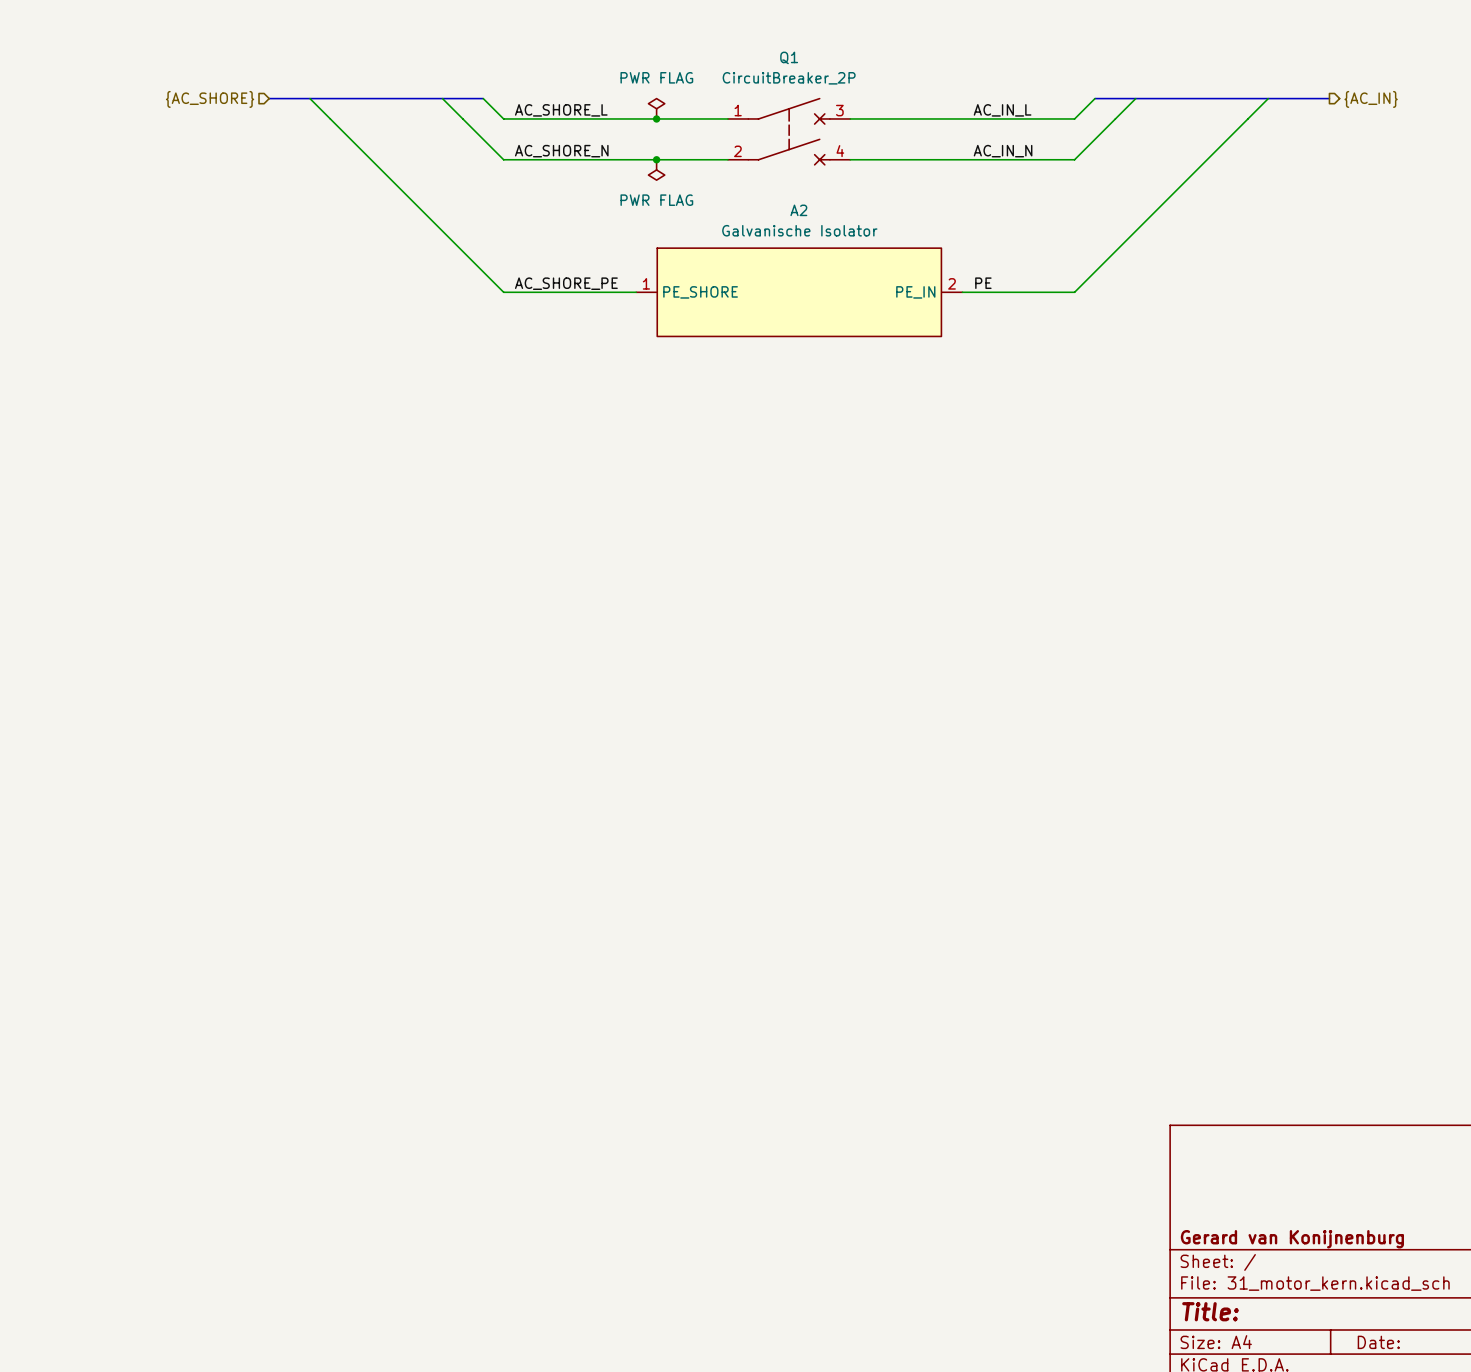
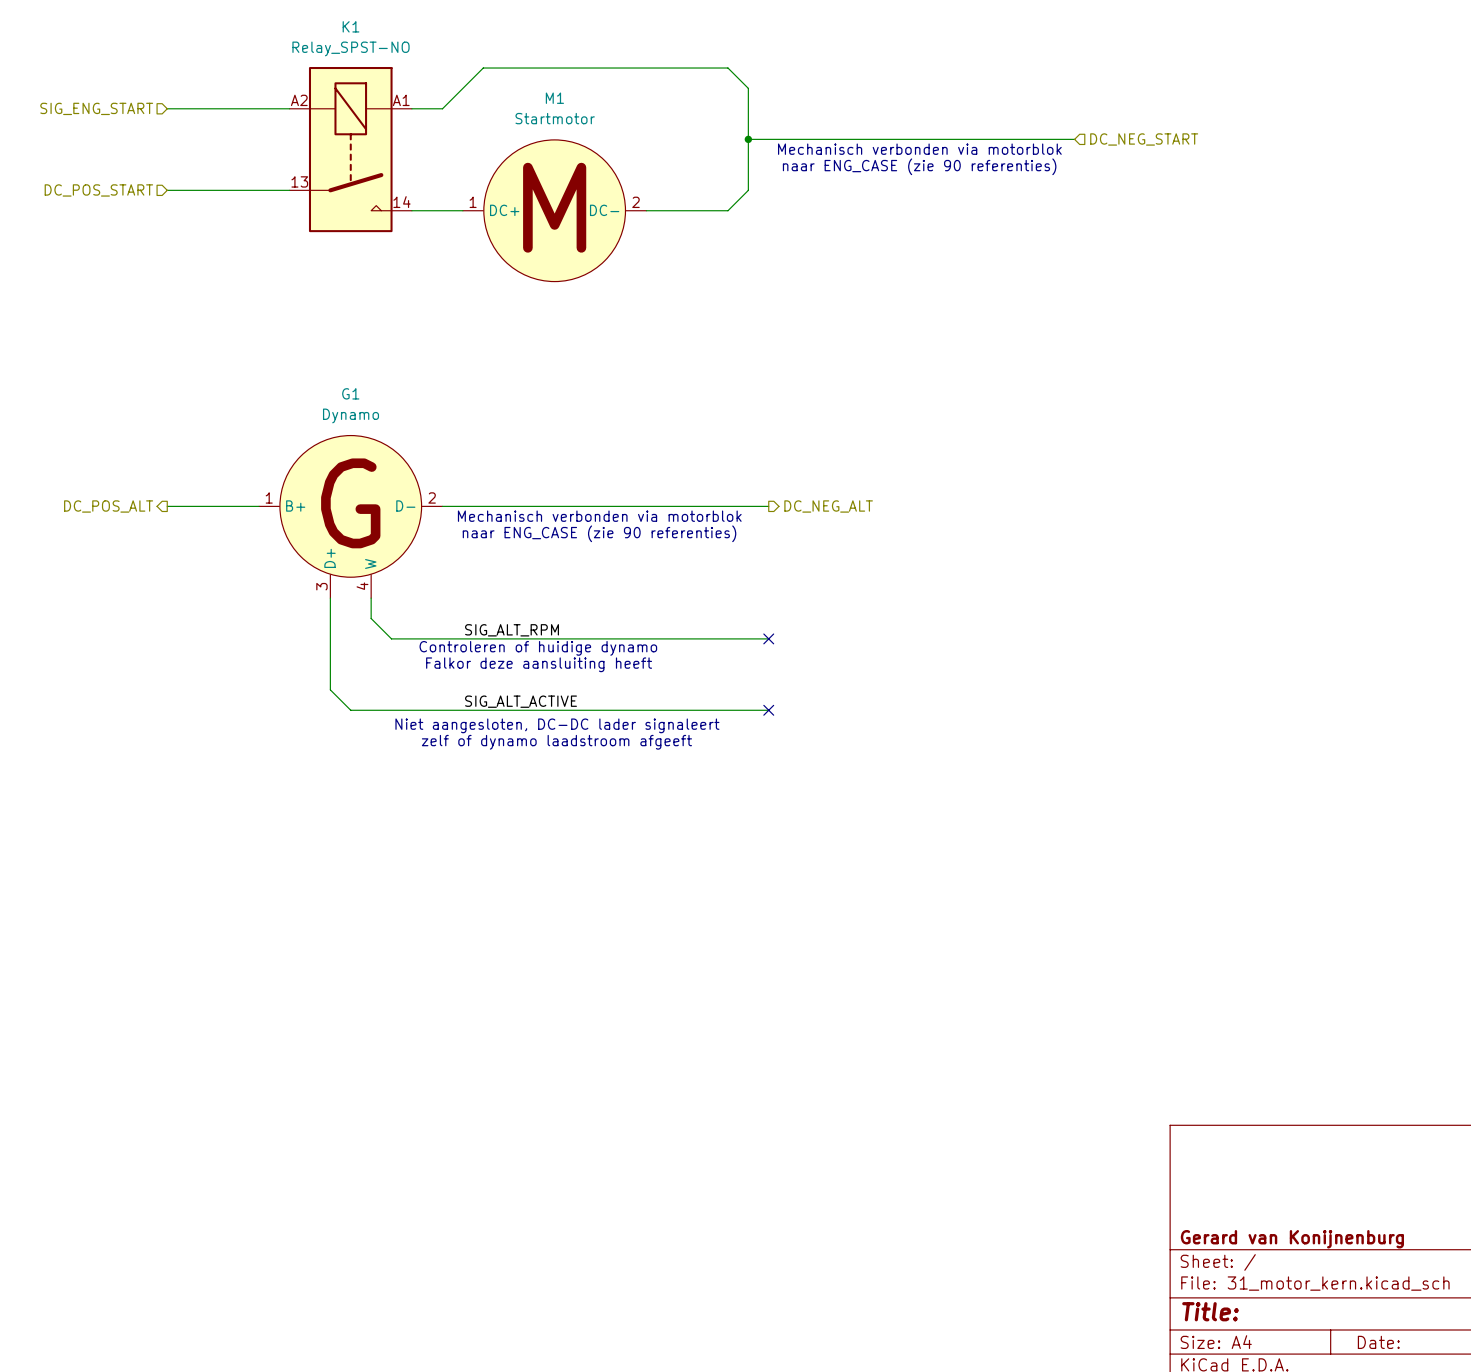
bus: (269, 98) (483, 98) -> none
wire: (309, 98) (503, 292) (636, 292) -> none
wire: (442, 98) (503, 159) (727, 159) -> none
wire: (483, 98) (503, 118) (727, 118) -> none
wire: (1094, 98) (1074, 118) (850, 118) -> none
bus: (1094, 98) (1329, 98) -> none
wire: (1135, 98) (1074, 159) (850, 159) -> none
wire: (1268, 98) (1074, 292) (962, 292) -> none
hierarchical label: {AC_SHORE} (210, 99) -> none
hierarchical label: {AC_IN} (1371, 99) -> none
hierarchical label: none -> SIG_ENG_START (96, 108)
wire: none -> (167, 108) (289, 108)
wire: none -> (411, 108) (442, 108) (483, 68) (727, 68) (748, 88) (748, 190) (727, 210) (646, 210)
power symbol: PWR FLAG (656, 108) -> none
label: AC_SHORE_L (561, 110) -> none
label: AC_IN_L (1002, 110) -> none
junction: (656, 118) -> none
Q1: CircuitBreaker_2P (789, 131) -> none
wire: none -> (748, 139) (1074, 139)
junction: none -> (748, 139)
hierarchical label: none -> DC_NEG_START (1144, 139)
K1: none -> Relay_SPST-NO (350, 149)
text: none -> Mechanisch verbonden via motorblok (919, 149)
label: AC_SHORE_N (561, 151) -> none
label: AC_IN_N (1003, 151) -> none
junction: (656, 159) -> none
text: none -> naar ENG_CASE (zie 90 referenties) (919, 166)
power symbol: PWR FLAG (656, 169) -> none
hierarchical label: none -> DC_POS_START (98, 190)
wire: none -> (167, 190) (289, 190)
wire: none -> (411, 210) (462, 210)
M1: none -> Startmotor (554, 210)
label: AC_SHORE_PE (566, 283) -> none
label: PE (983, 283) -> none
A2: Galvanische Isolator (799, 292) -> none
hierarchical label: none -> DC_POS_ALT (108, 506)
wire: none -> (167, 506) (259, 506)
wire: none -> (442, 506) (768, 506)
hierarchical label: none -> DC_NEG_ALT (828, 506)
G1: none -> Dynamo (350, 516)
text: none -> Mechanisch verbonden via motorblok (599, 516)
text: none -> naar ENG_CASE (zie 90 referenties) (599, 533)
wire: none -> (330, 598) (330, 689) (350, 710) (768, 710)
wire: none -> (371, 598) (371, 618) (391, 638) (768, 638)
label: none -> SIG_ALT_RPM (512, 630)
no-connect mark: none -> (768, 638)
text: none -> Controleren of huidige dynamo (538, 648)
text: none -> Falkor deze aansluiting heeft (539, 664)
label: none -> SIG_ALT_ACTIVE (520, 701)
no-connect mark: none -> (768, 710)
text: none -> Niet aangesloten, DC-DC lader signaleert (557, 725)
text: none -> zelf of dynamo laadstroom afgeeft (556, 742)

